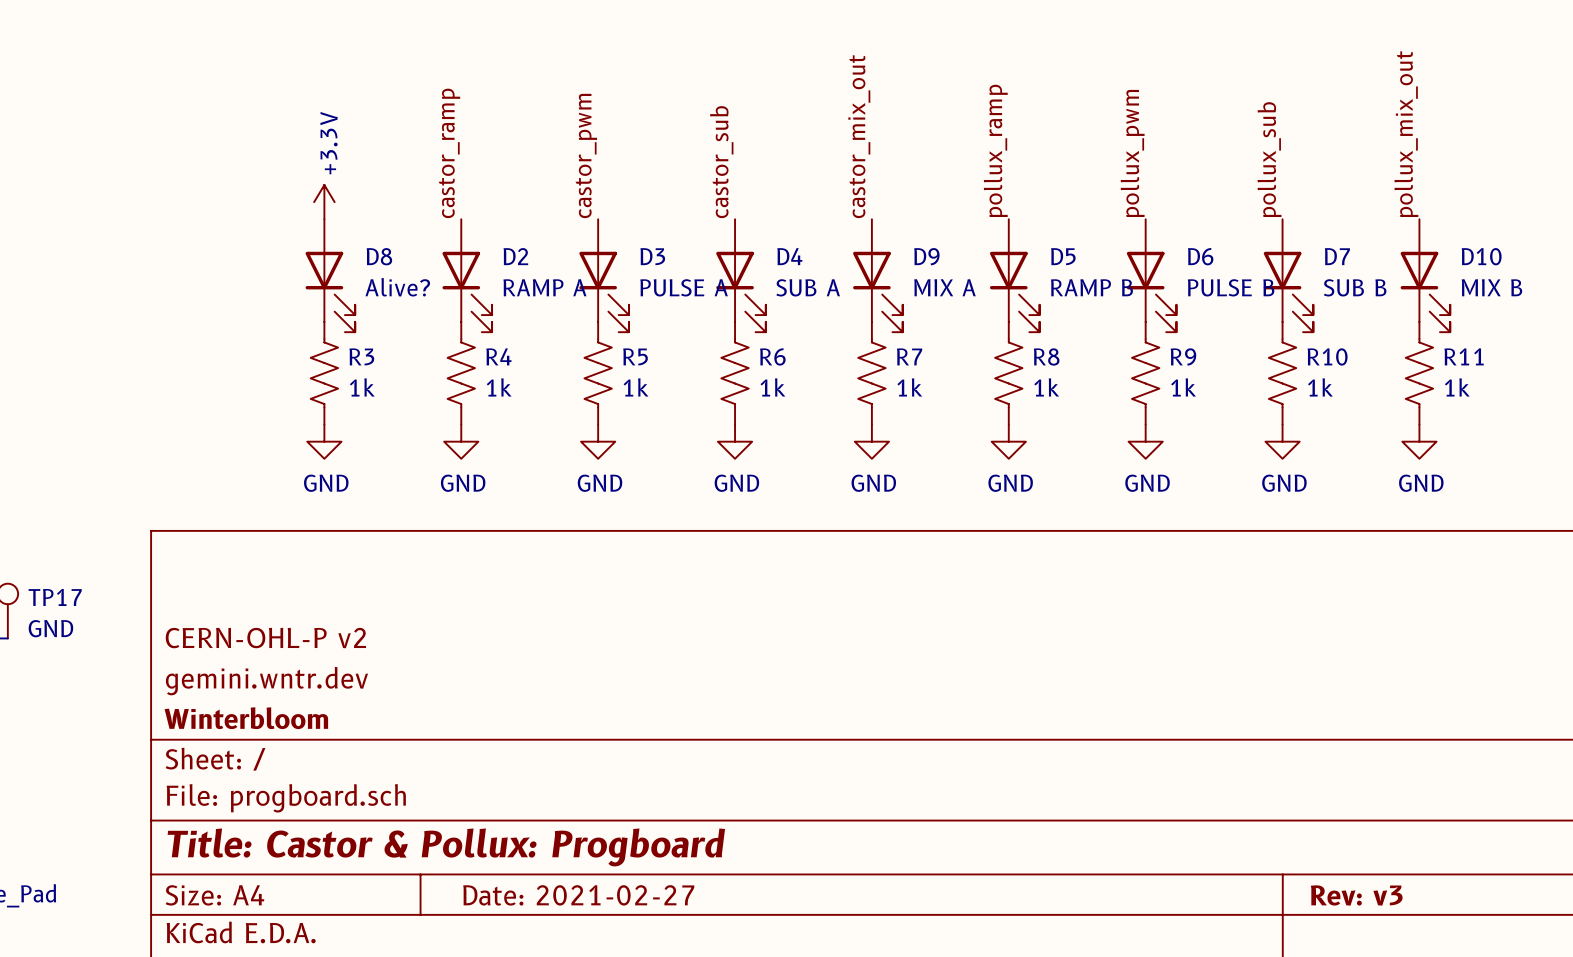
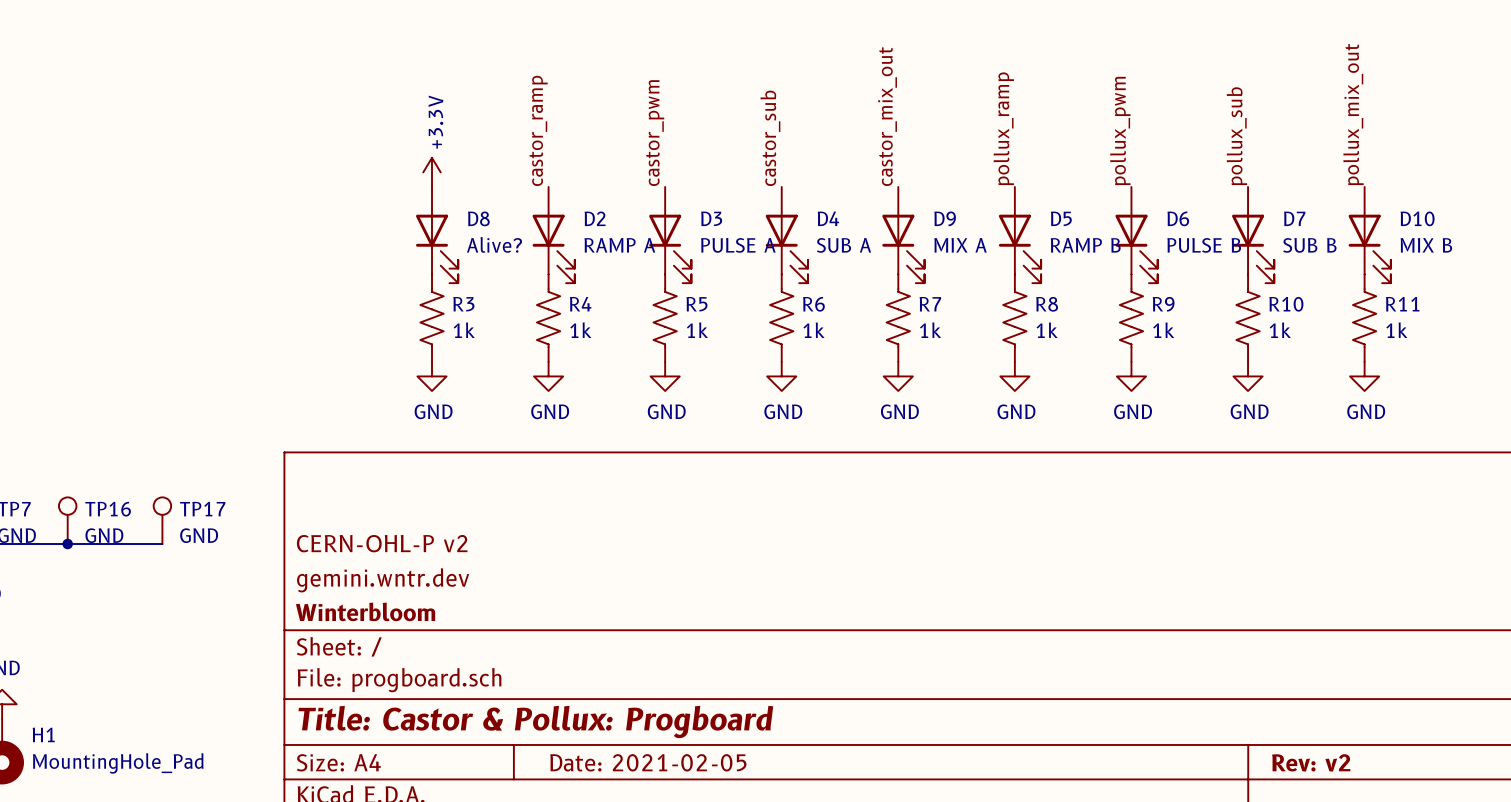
title block: Date: 2021-02-27 (578, 895) -> Date: 2021-02-05 (648, 762)
title block: Rev: v3 (1356, 895) -> Rev: v2 (1311, 762)

